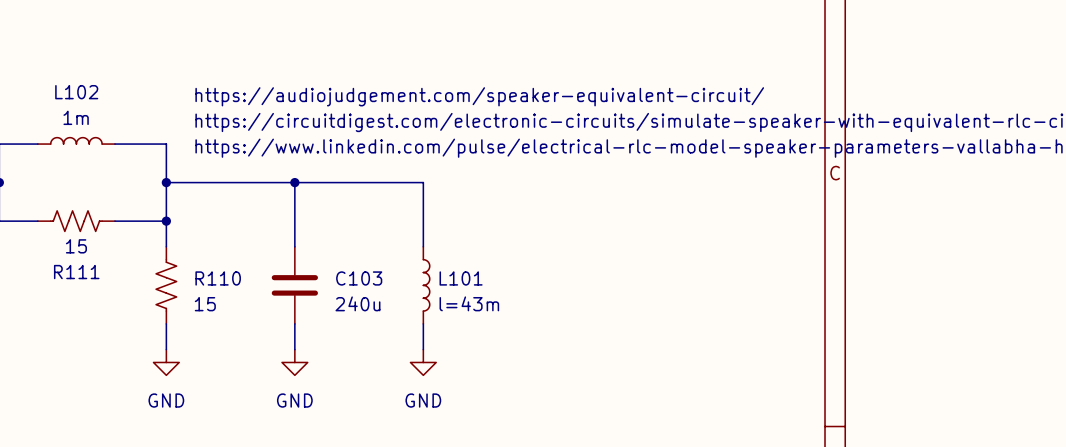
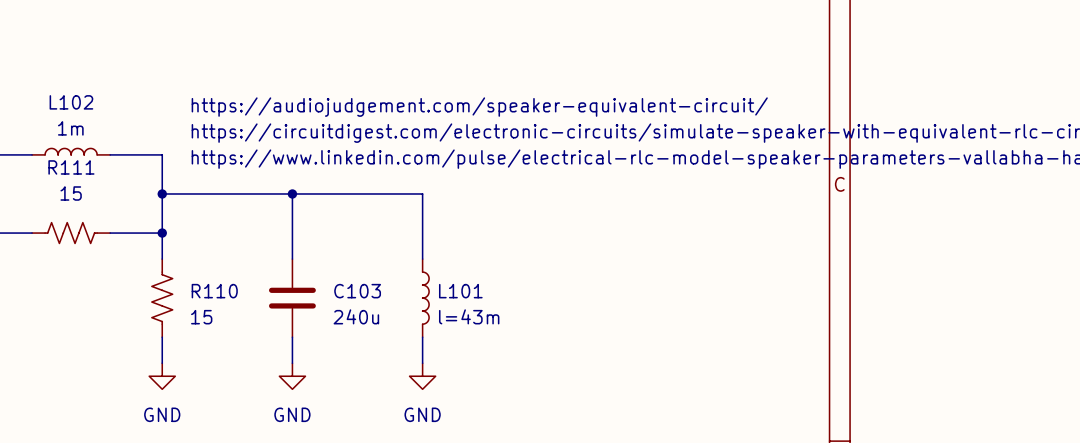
R111 value position: 15 (76, 246) -> 15 (71, 193)
R111 name position: R111 (76, 272) -> R111 (71, 167)

